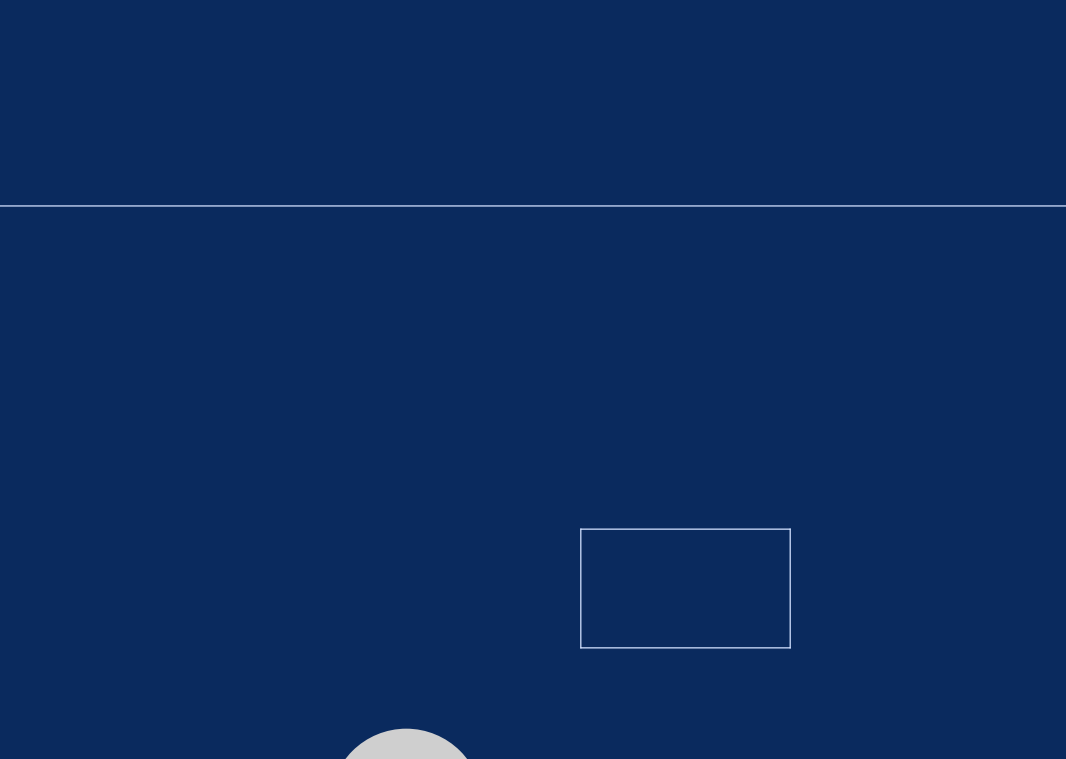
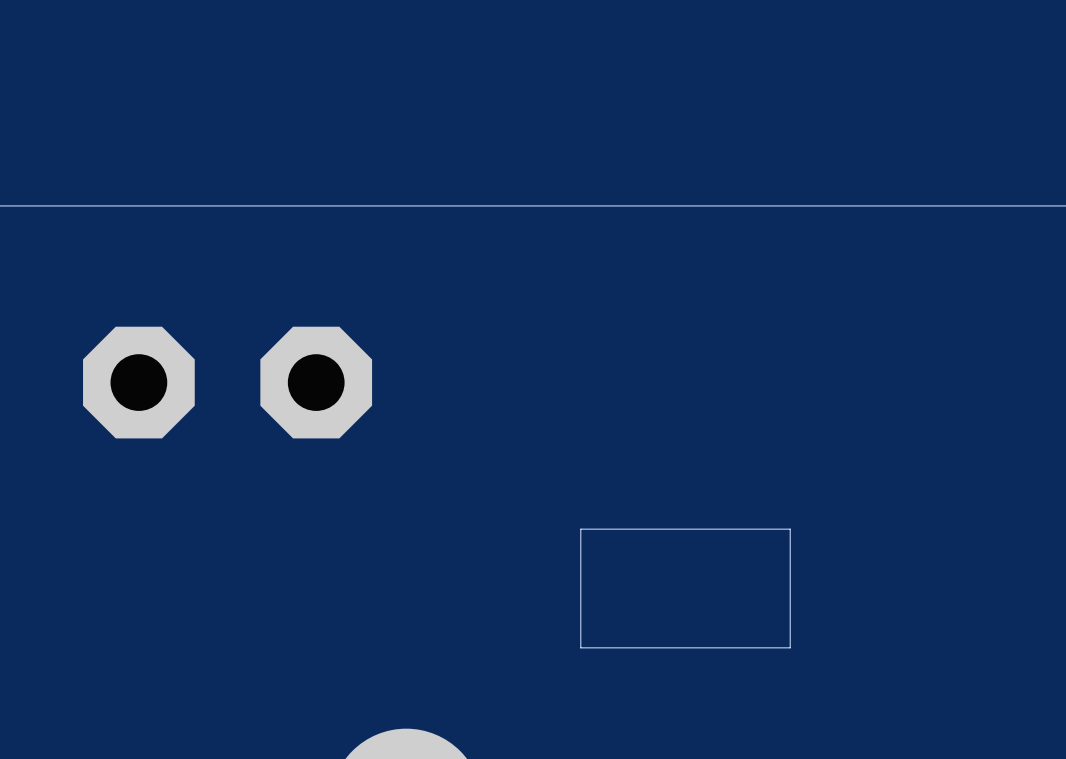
part: none -> (227, 382)

